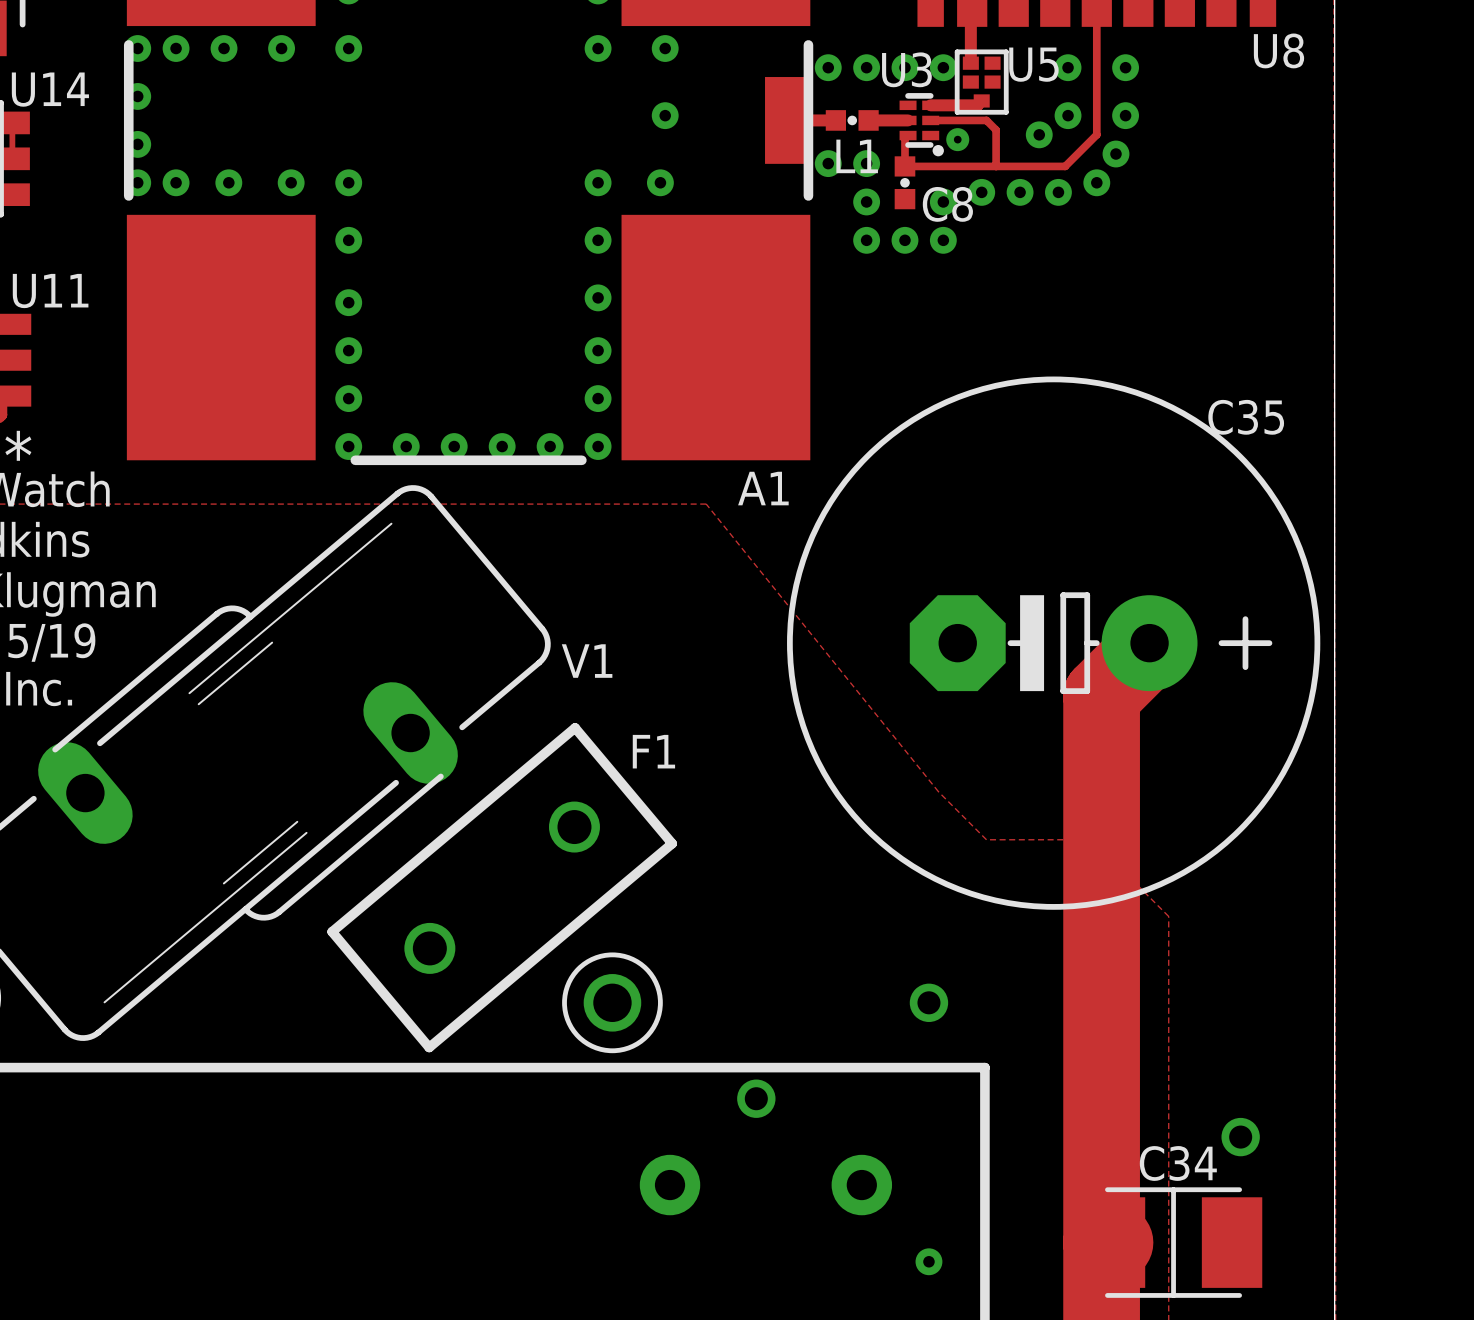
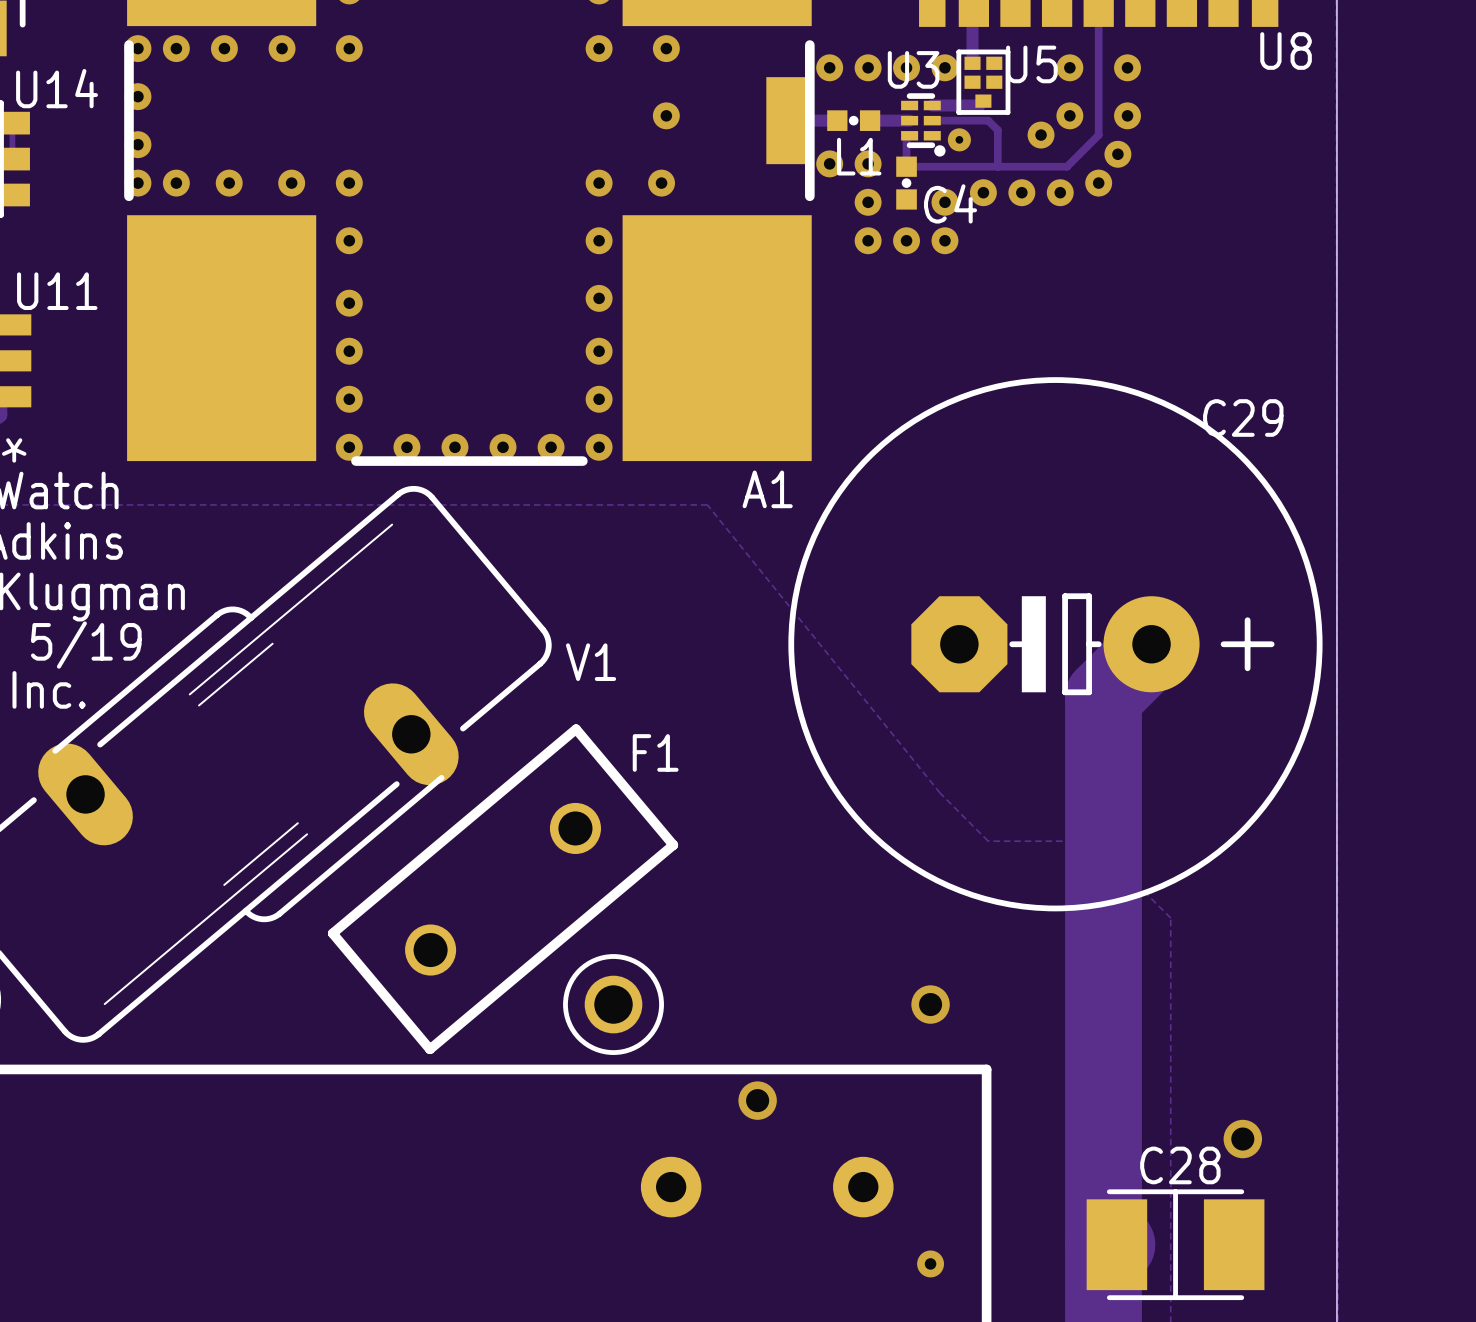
C8 name: C8 (947, 204) -> C4 (950, 203)
C35 name: C35 (1246, 417) -> C29 (1243, 418)
C34 name: C34 (1178, 1163) -> C28 (1180, 1165)

